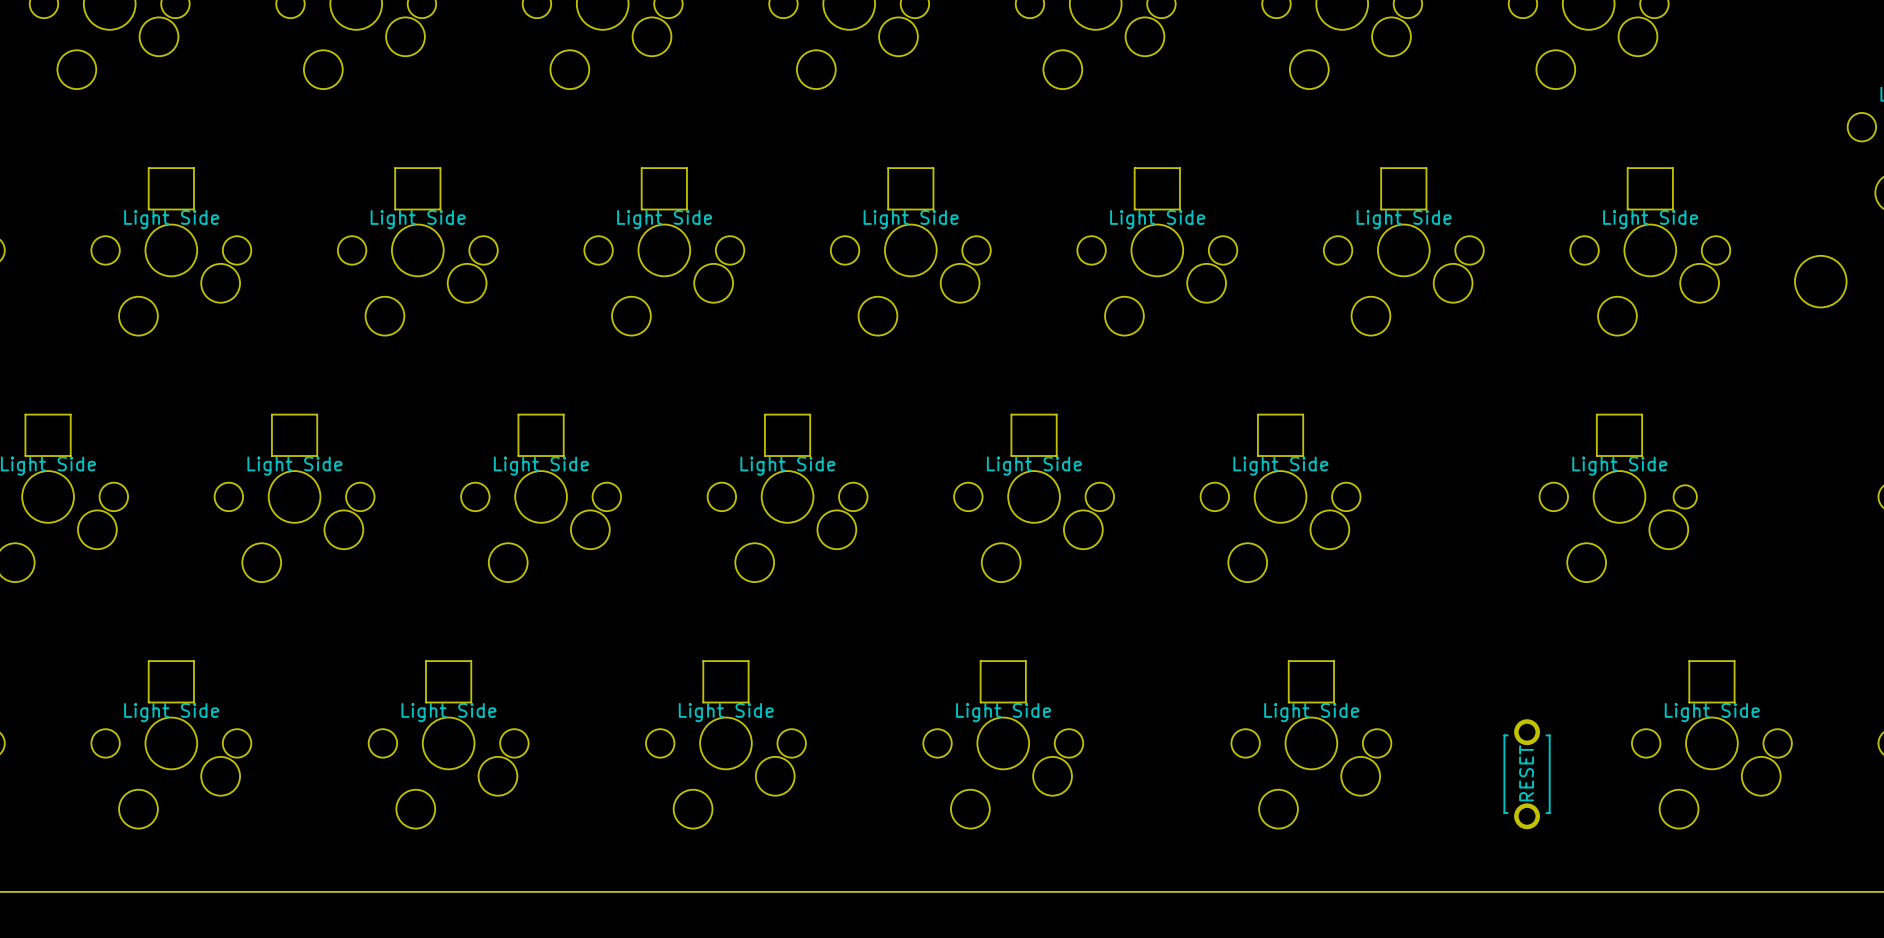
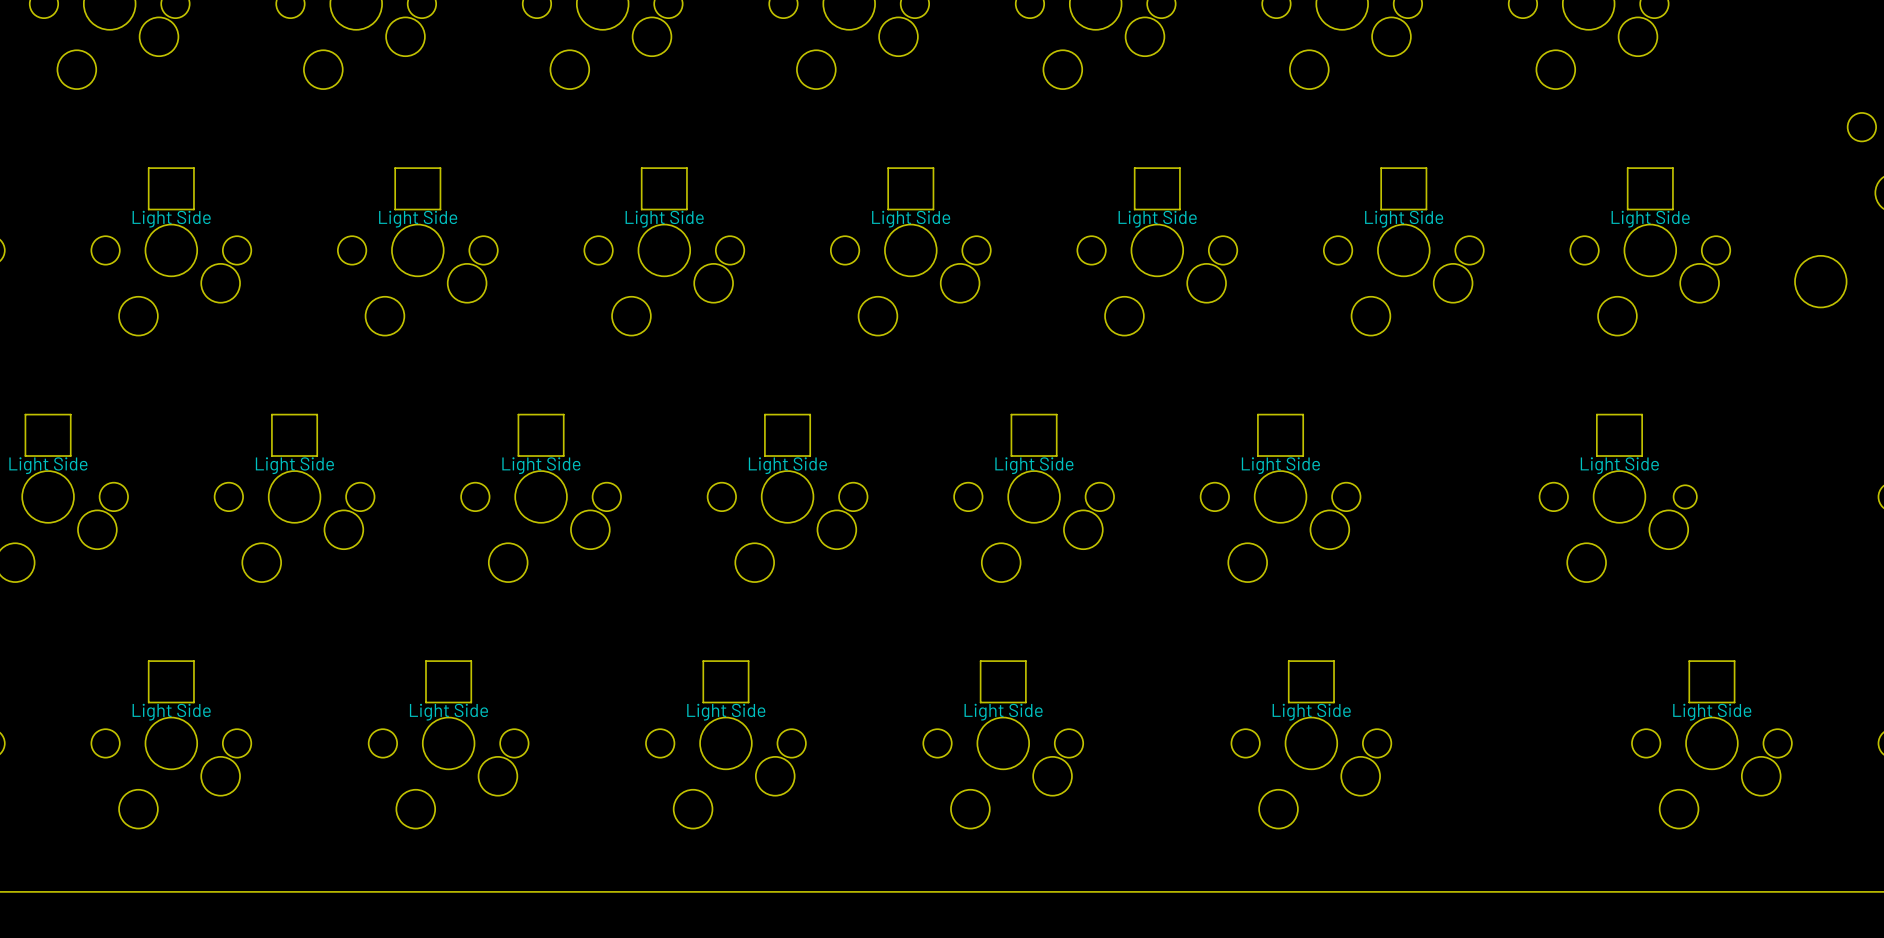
part: (1527, 774) -> none

